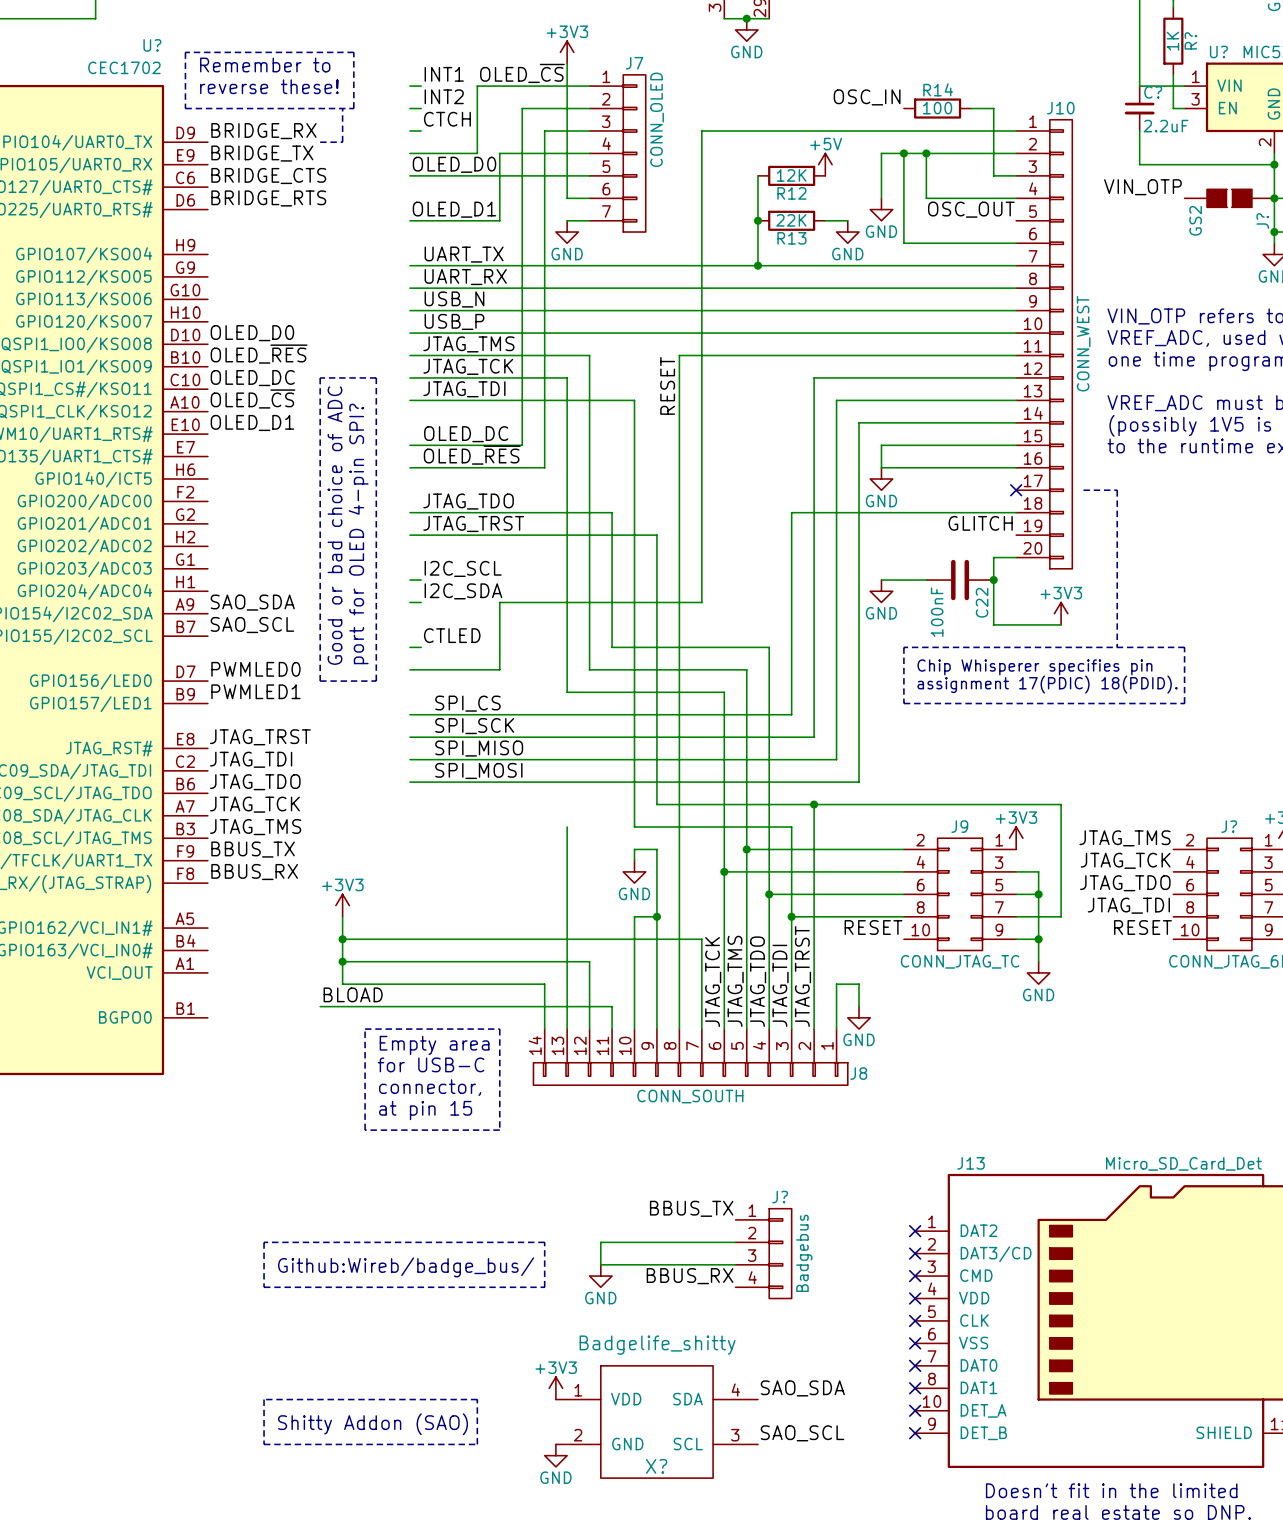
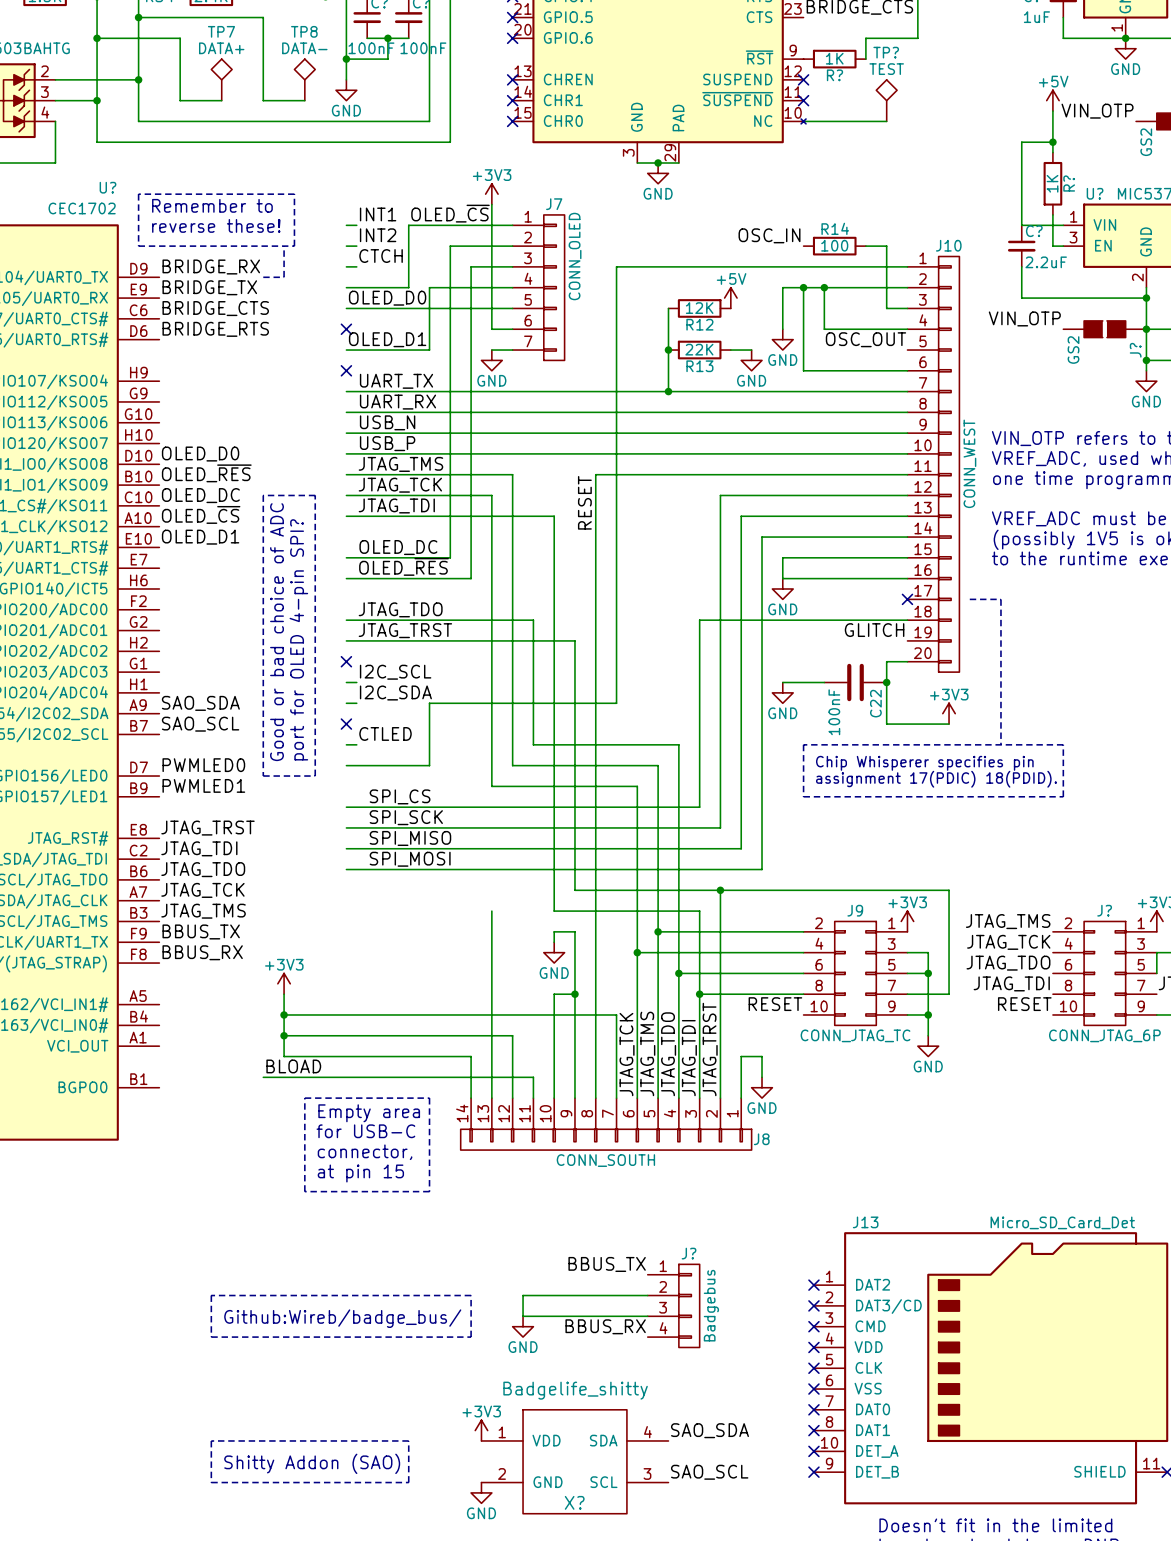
no-connect mark: none -> (346, 329)
no-connect mark: none -> (346, 370)
no-connect mark: none -> (346, 661)
no-connect mark: none -> (346, 724)

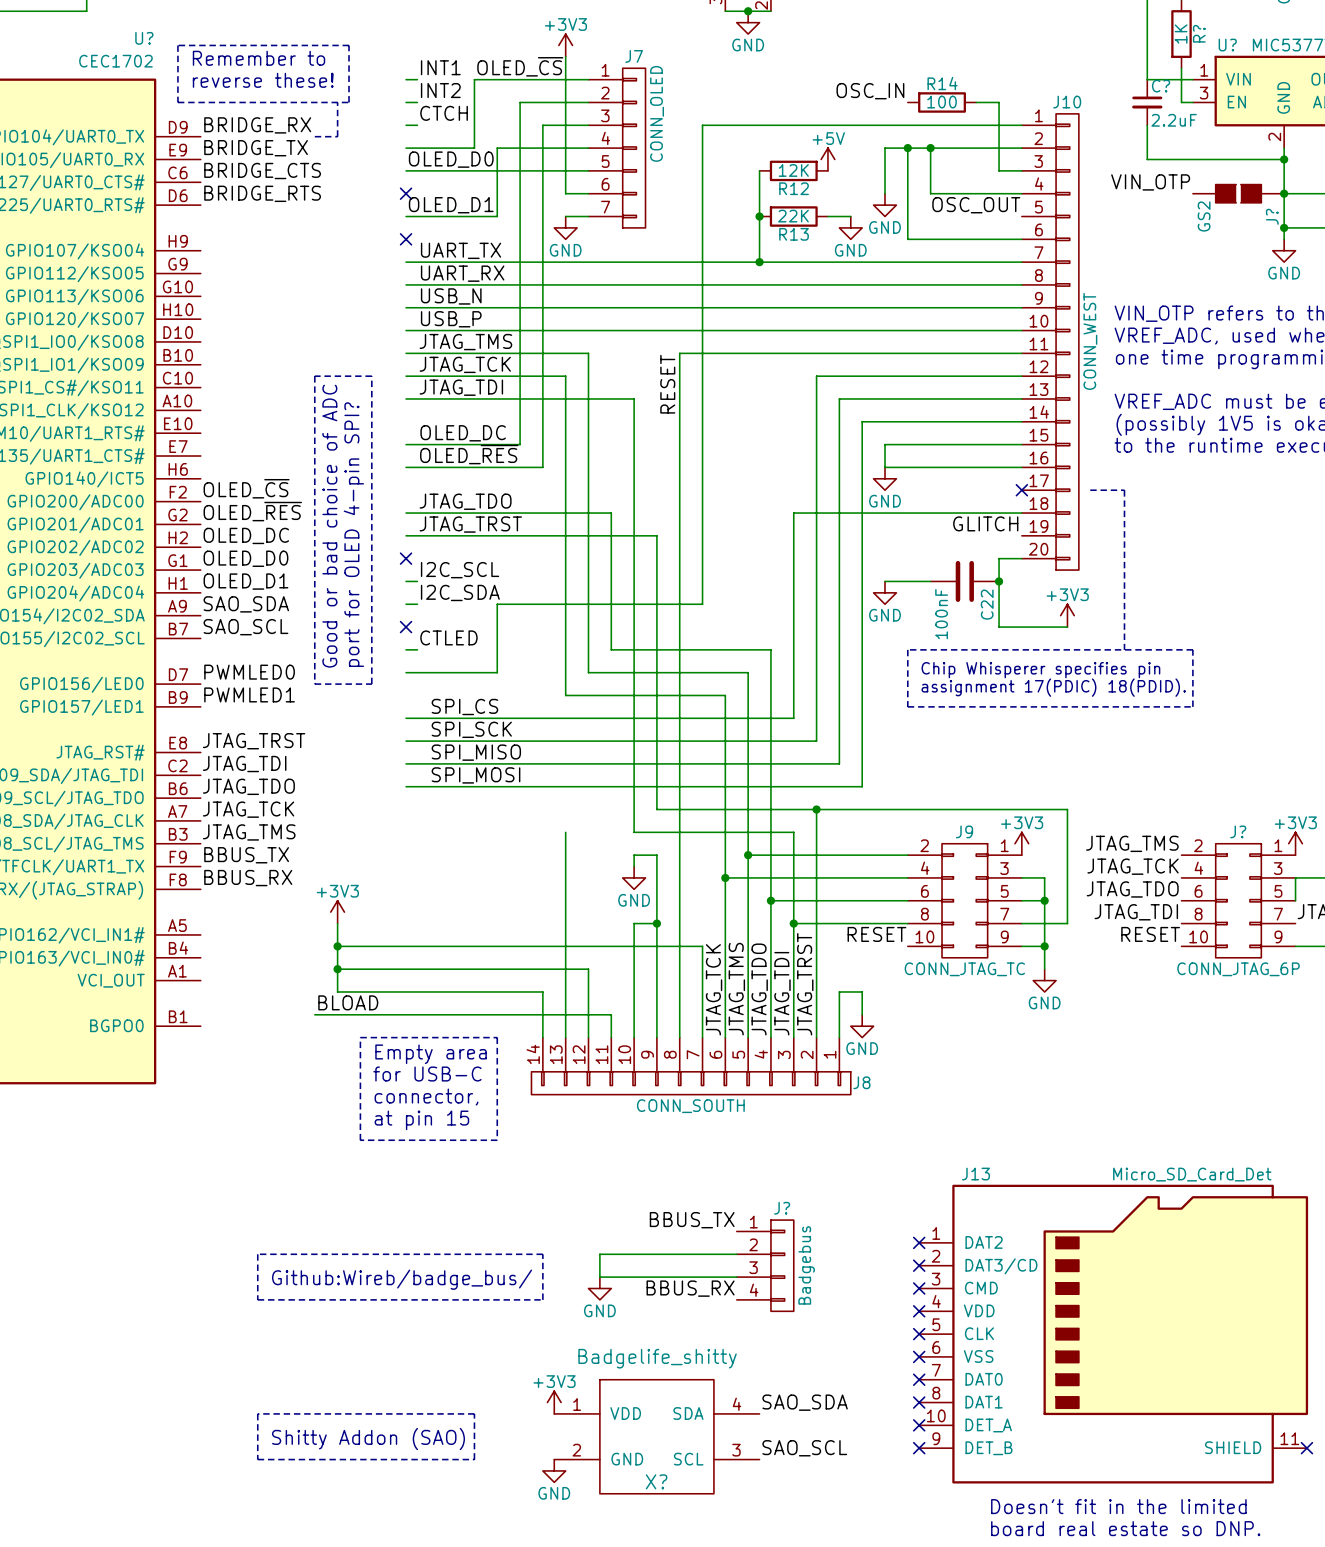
label: OLED_D0 (200, 454) -> none
label position: OLED_~{RES} (206, 473) -> OLED_~{RES} (252, 511)
label position: OLED_DC (200, 495) -> OLED_DC (246, 535)
label position: OLED_~{CS} (201, 514) -> OLED_~{CS} (246, 488)
label position: OLED_D1 (200, 537) -> OLED_D1 (245, 581)
label: none -> OLED_D0 (245, 558)

